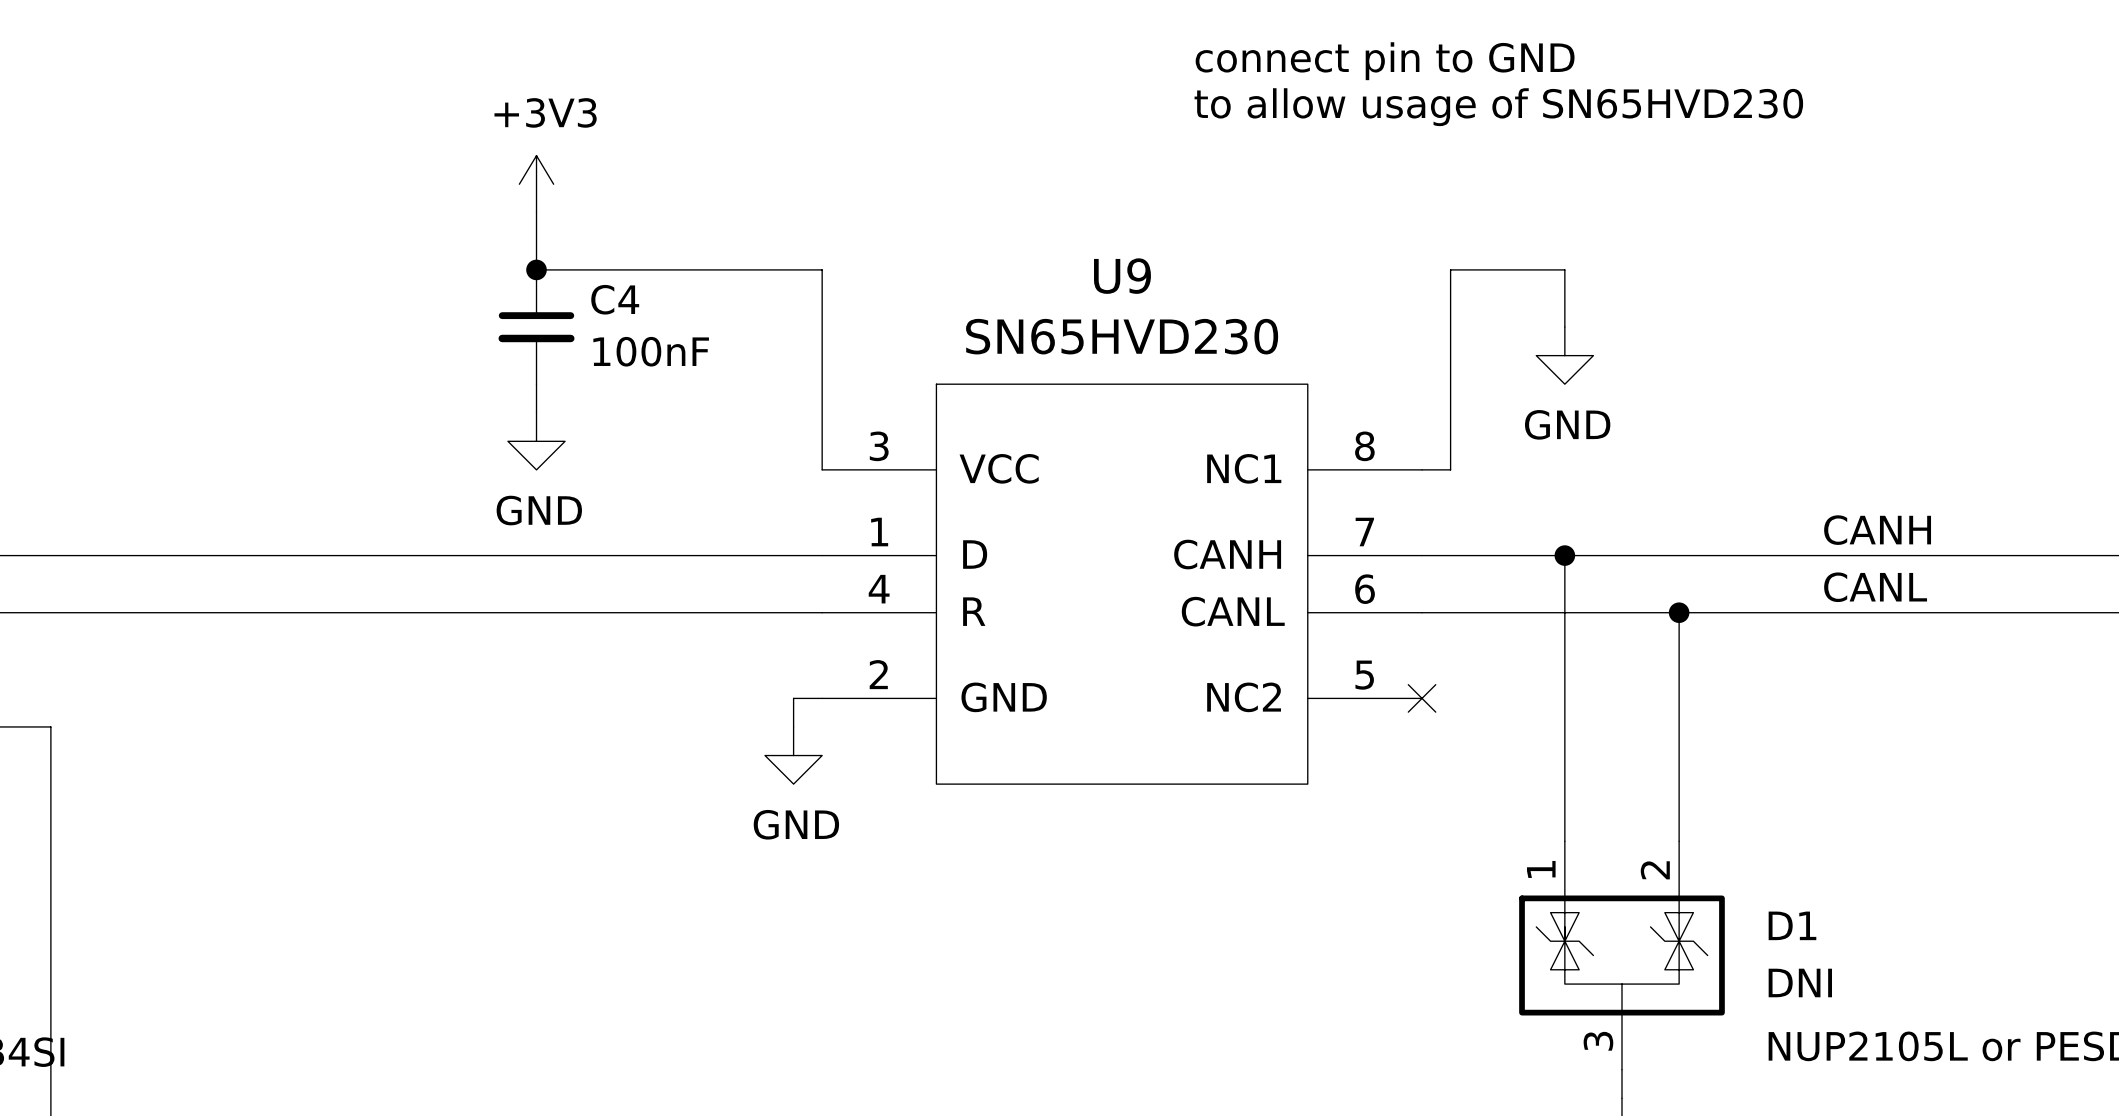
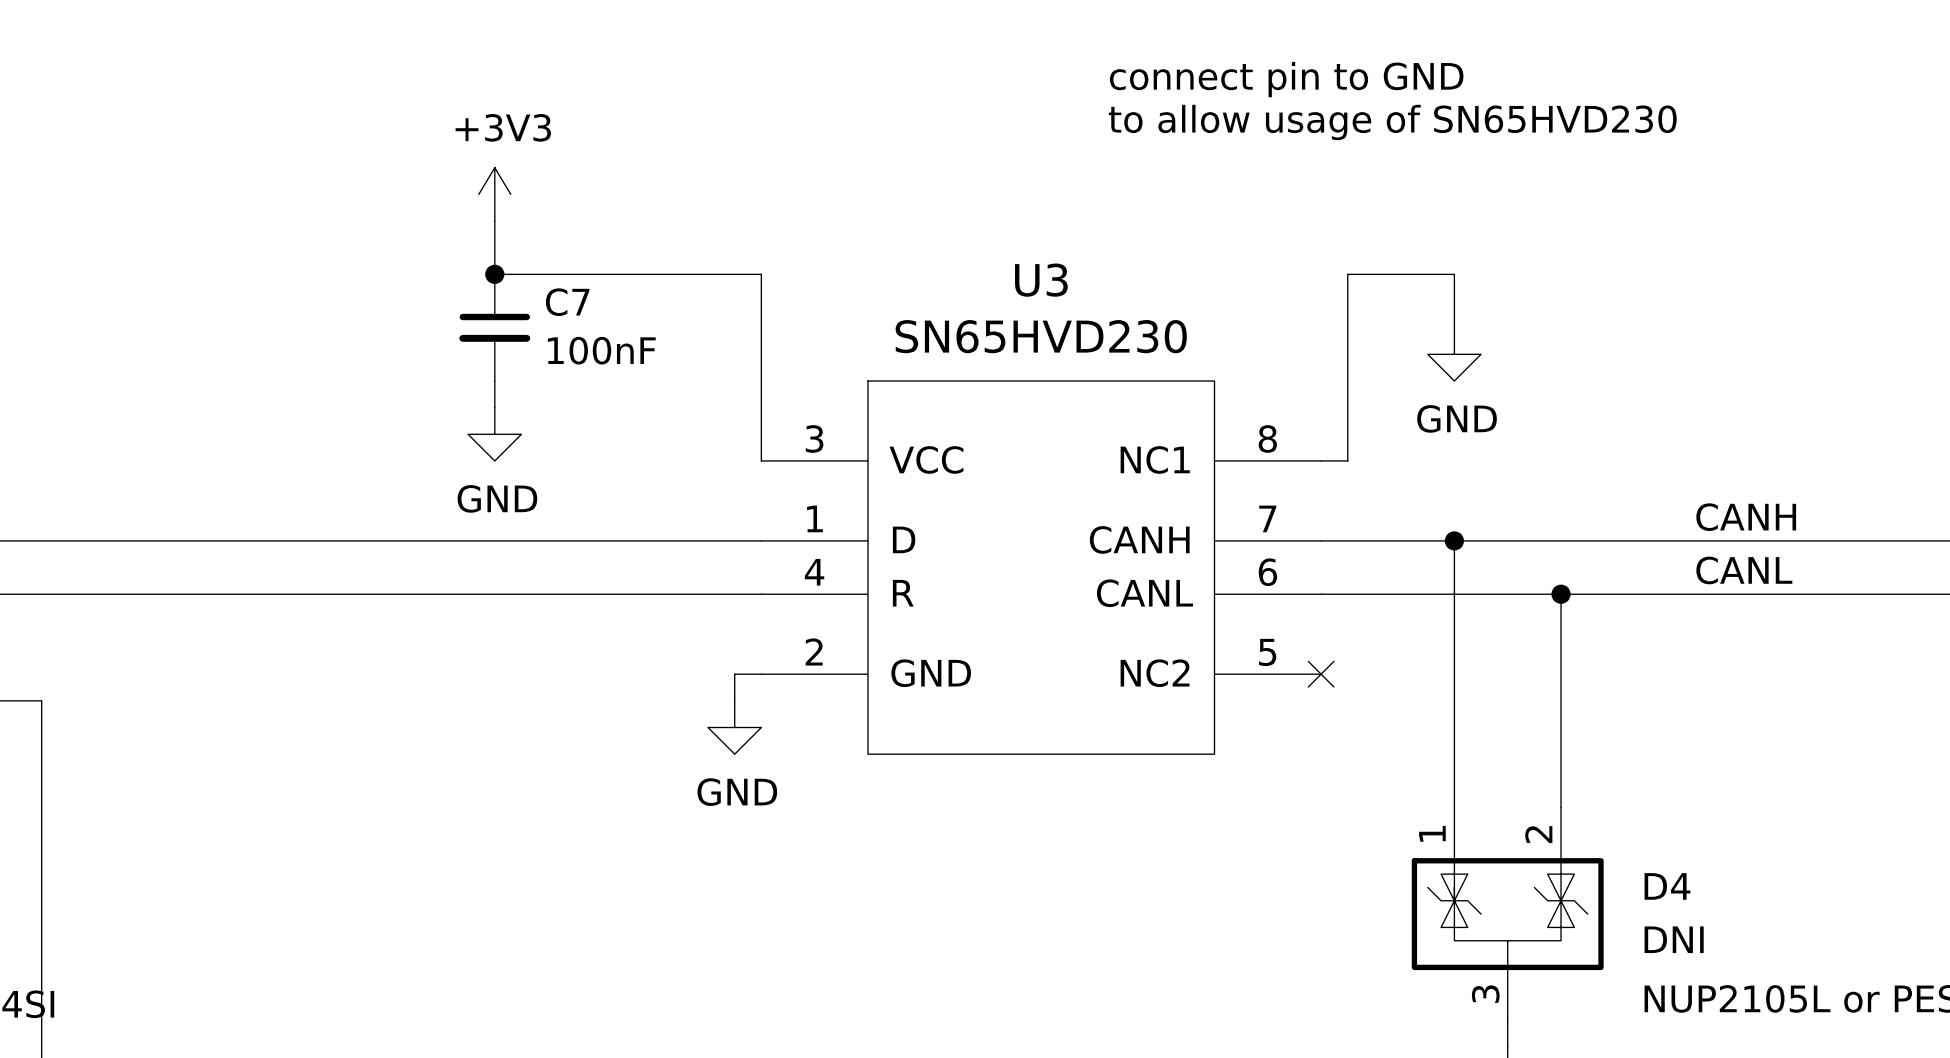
U9 name: U9 (1122, 276) -> U3 (1041, 280)
C4 name: C4 (615, 299) -> C7 (567, 302)
D1 name: D1 (1792, 925) -> D4 (1667, 886)

